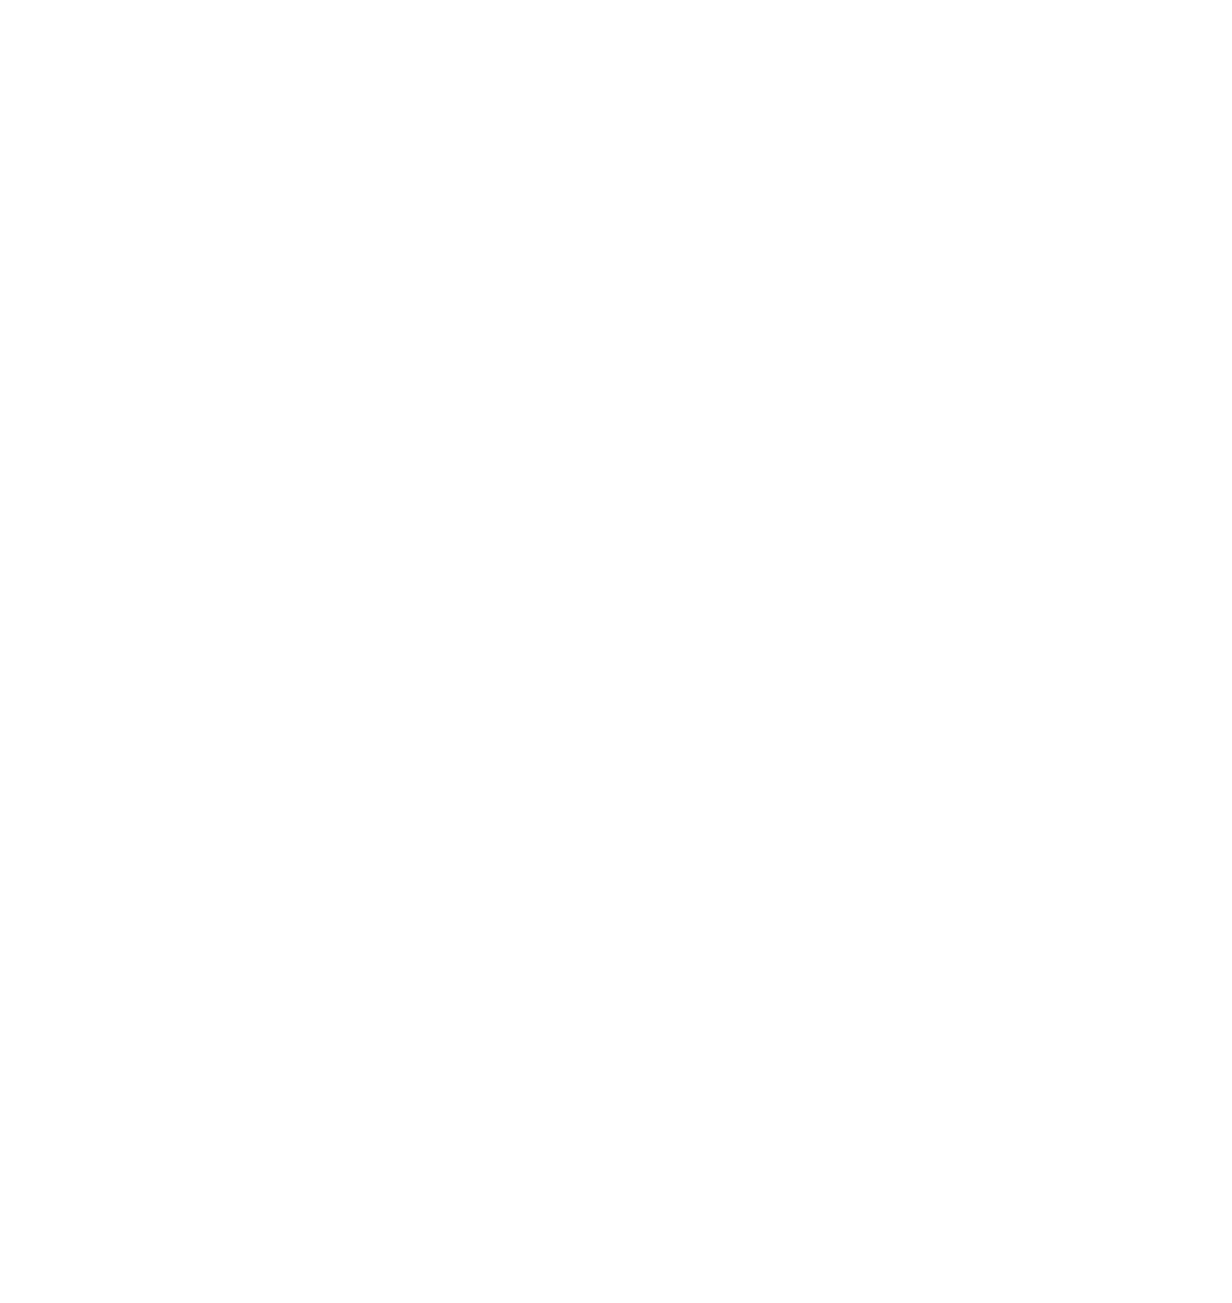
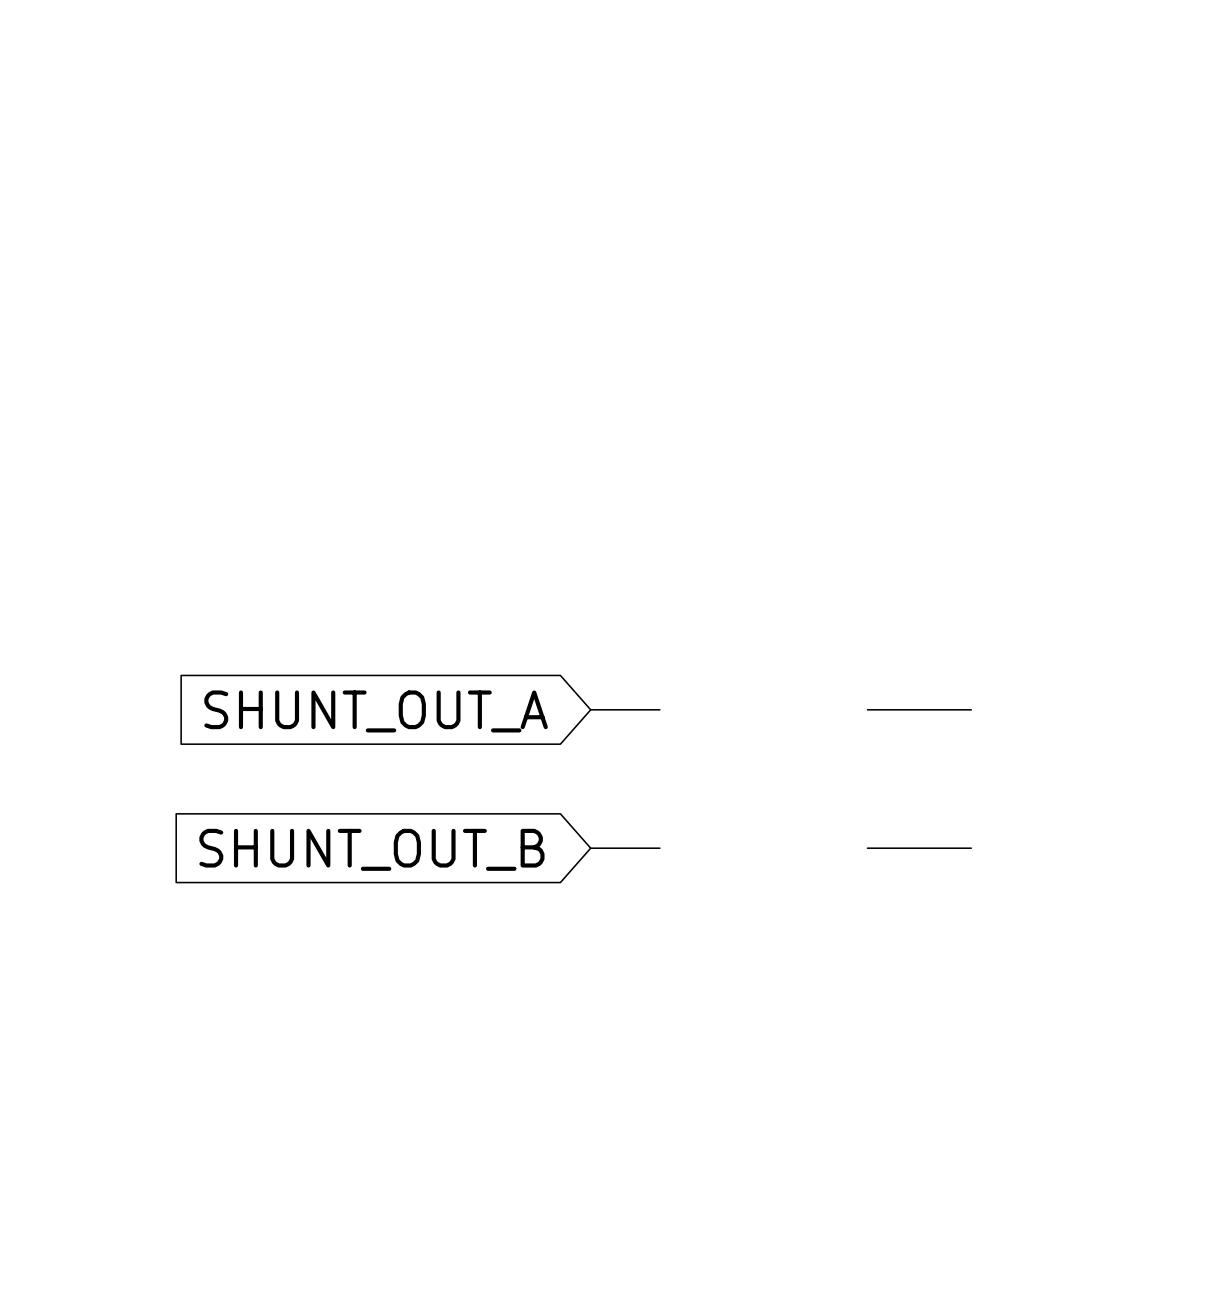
wire: none -> (590, 709) (659, 709)
wire: none -> (867, 709) (971, 709)
global label: none -> SHUNT_OUT_A (376, 711)
wire: none -> (590, 848) (659, 848)
wire: none -> (867, 848) (971, 848)
global label: none -> SHUNT_OUT_B (371, 849)

